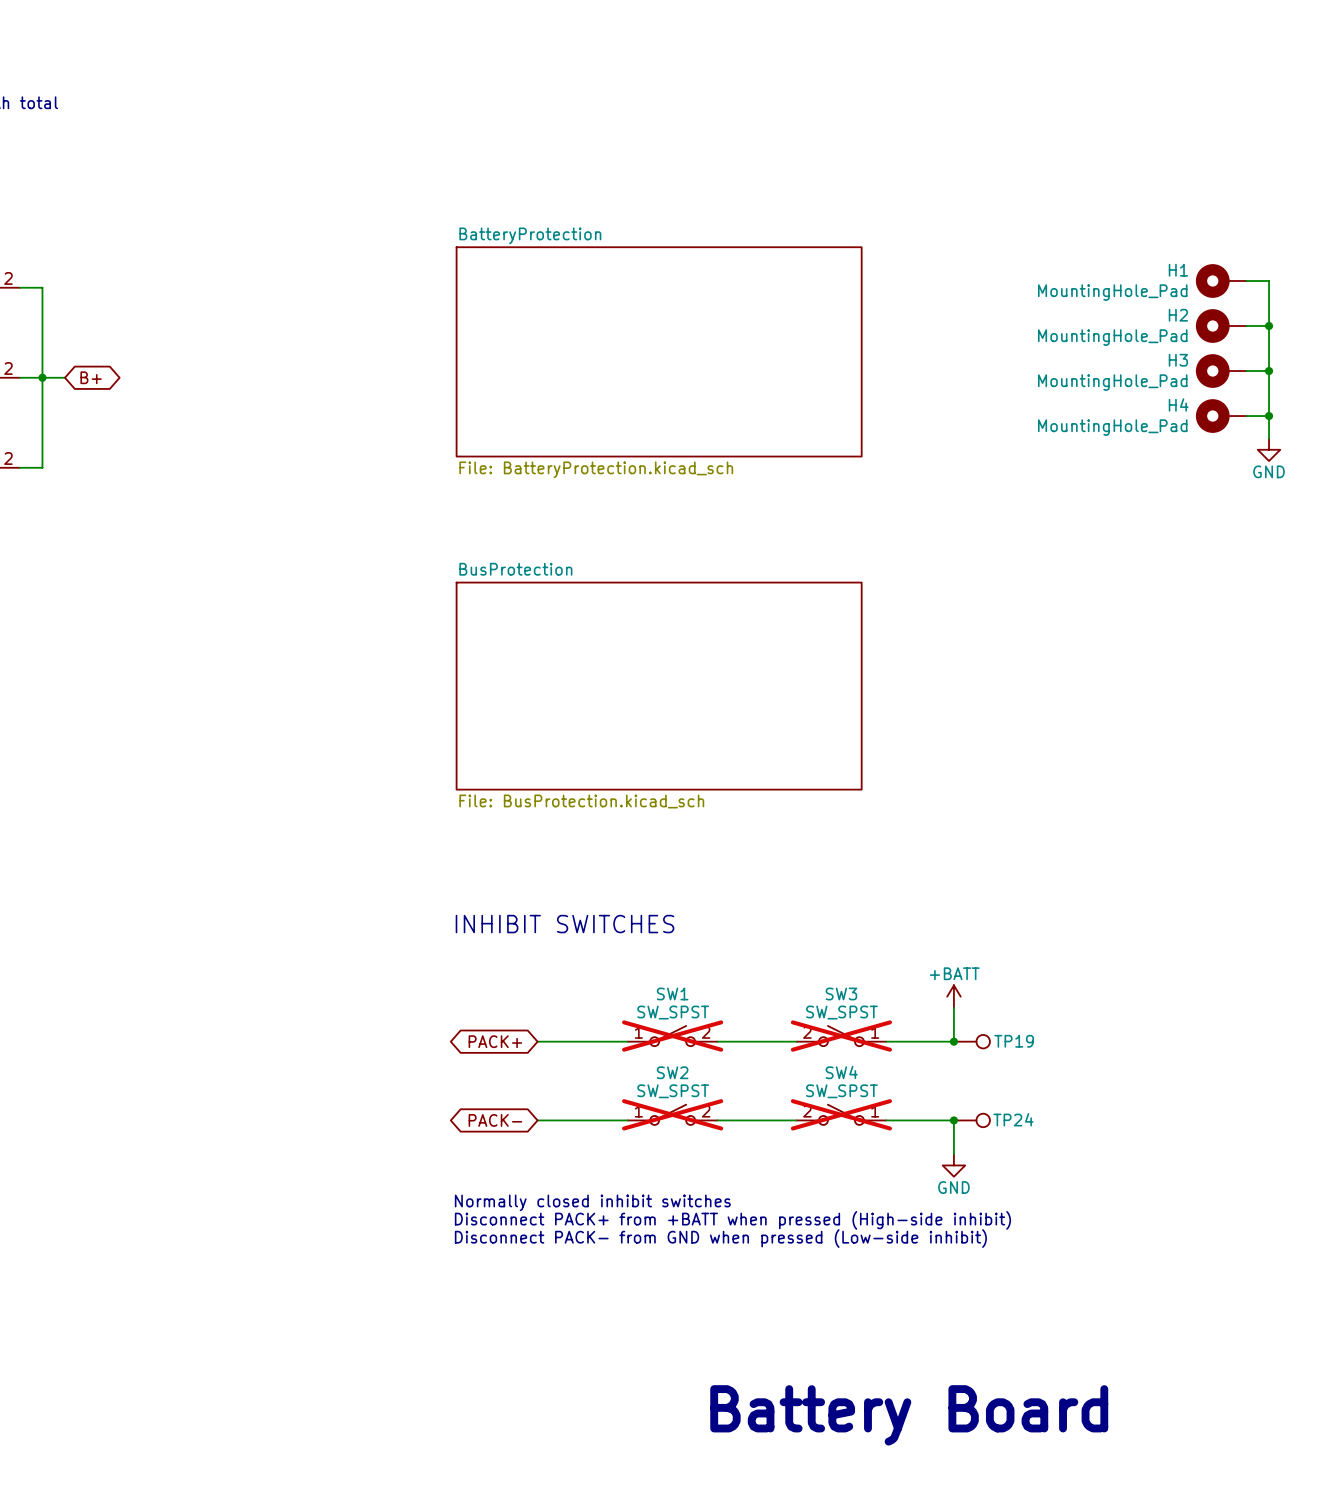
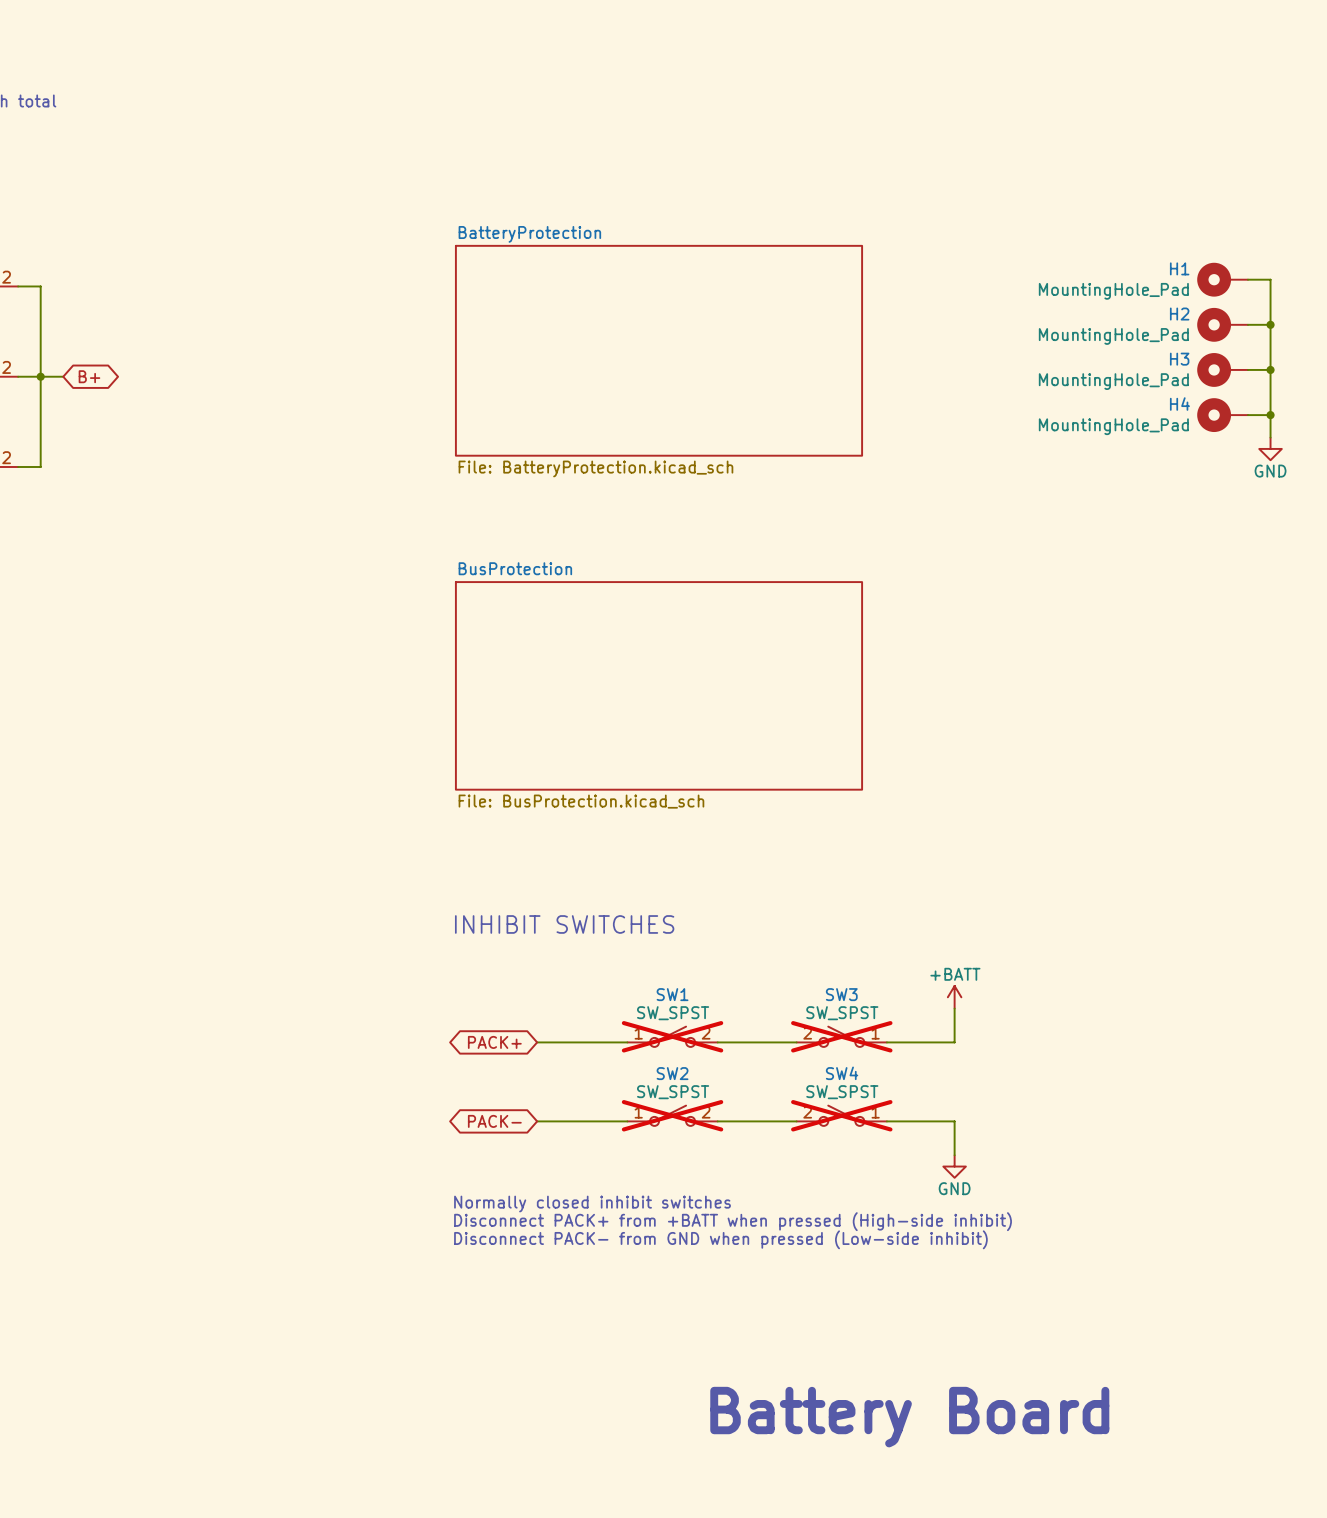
junction: (953, 1041) -> none
TP19: (971, 1041) -> none
junction: (953, 1120) -> none
TP24: (971, 1120) -> none

